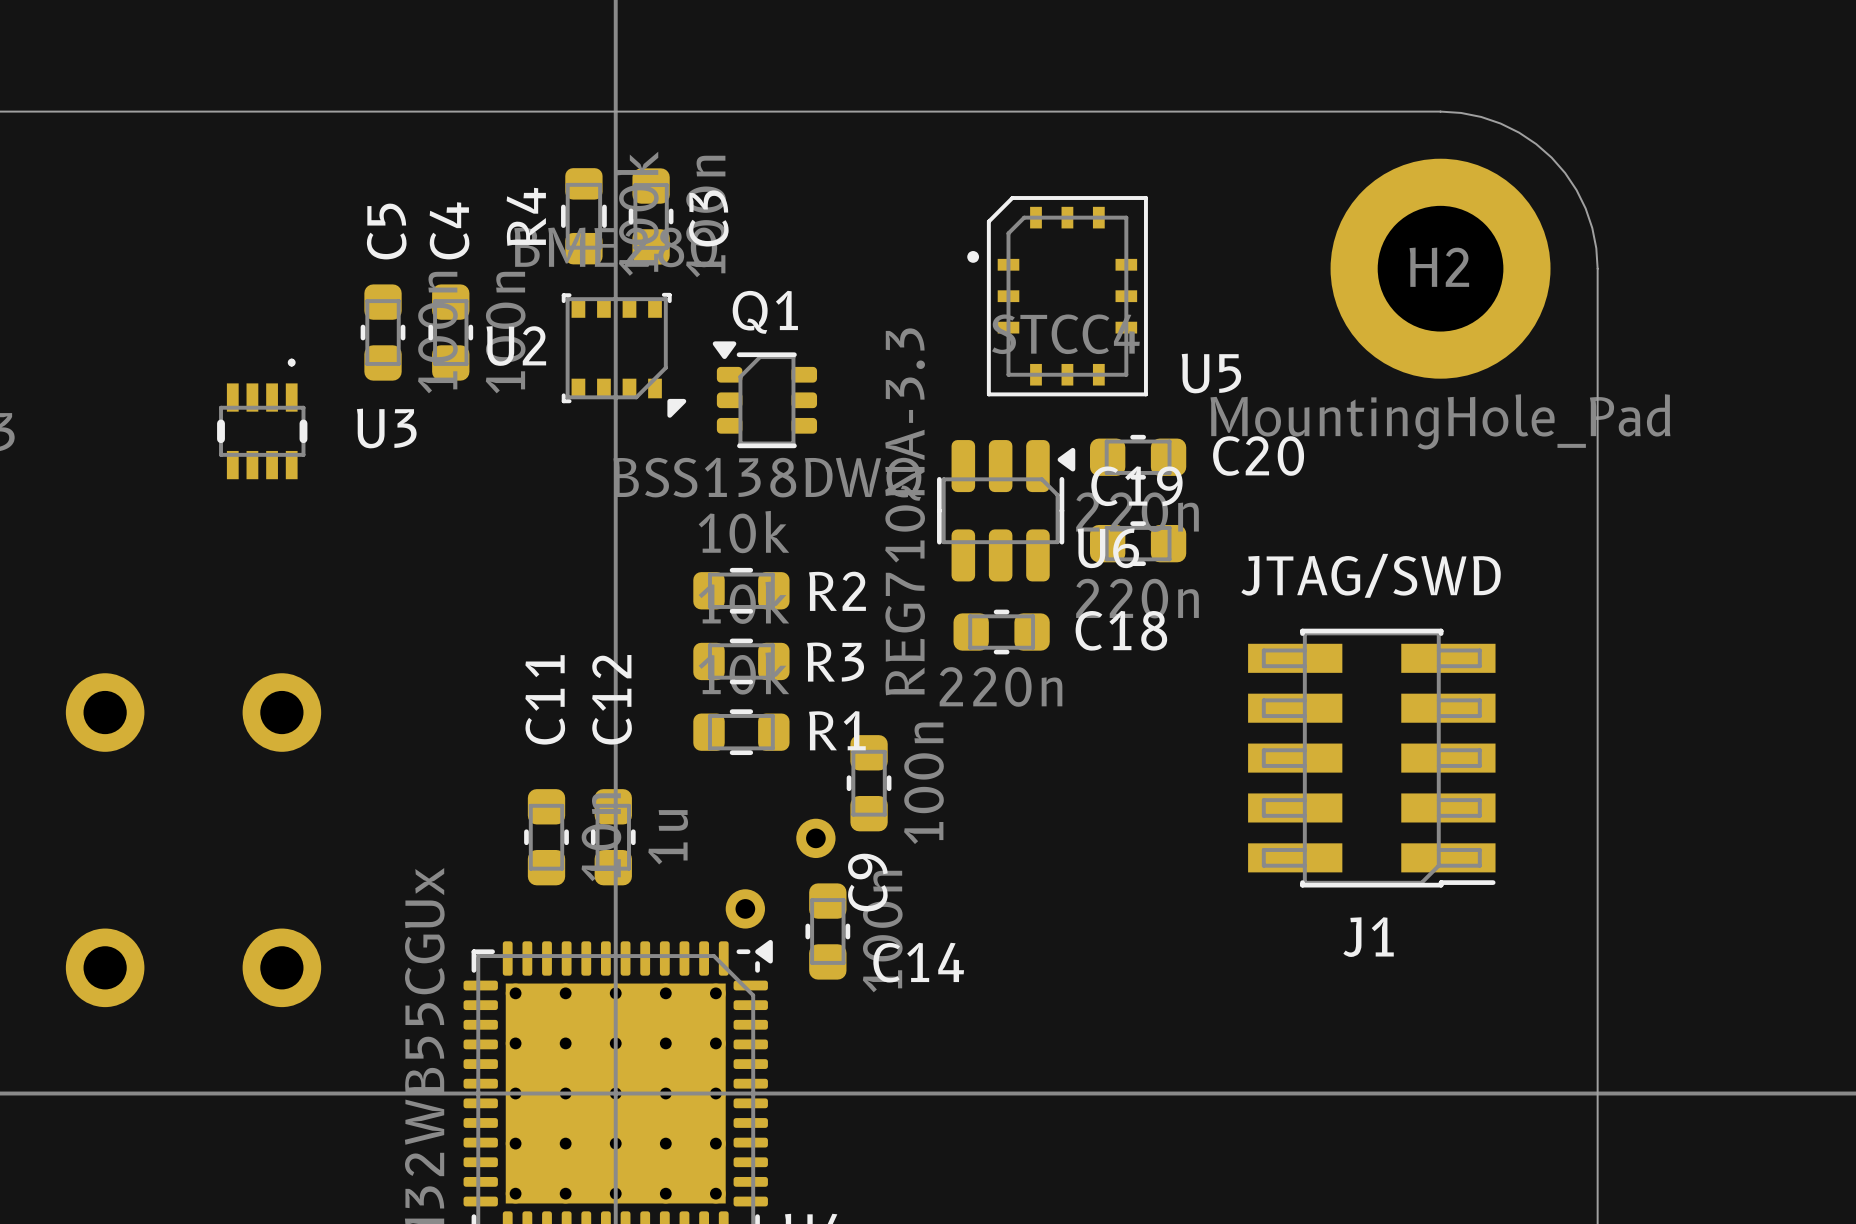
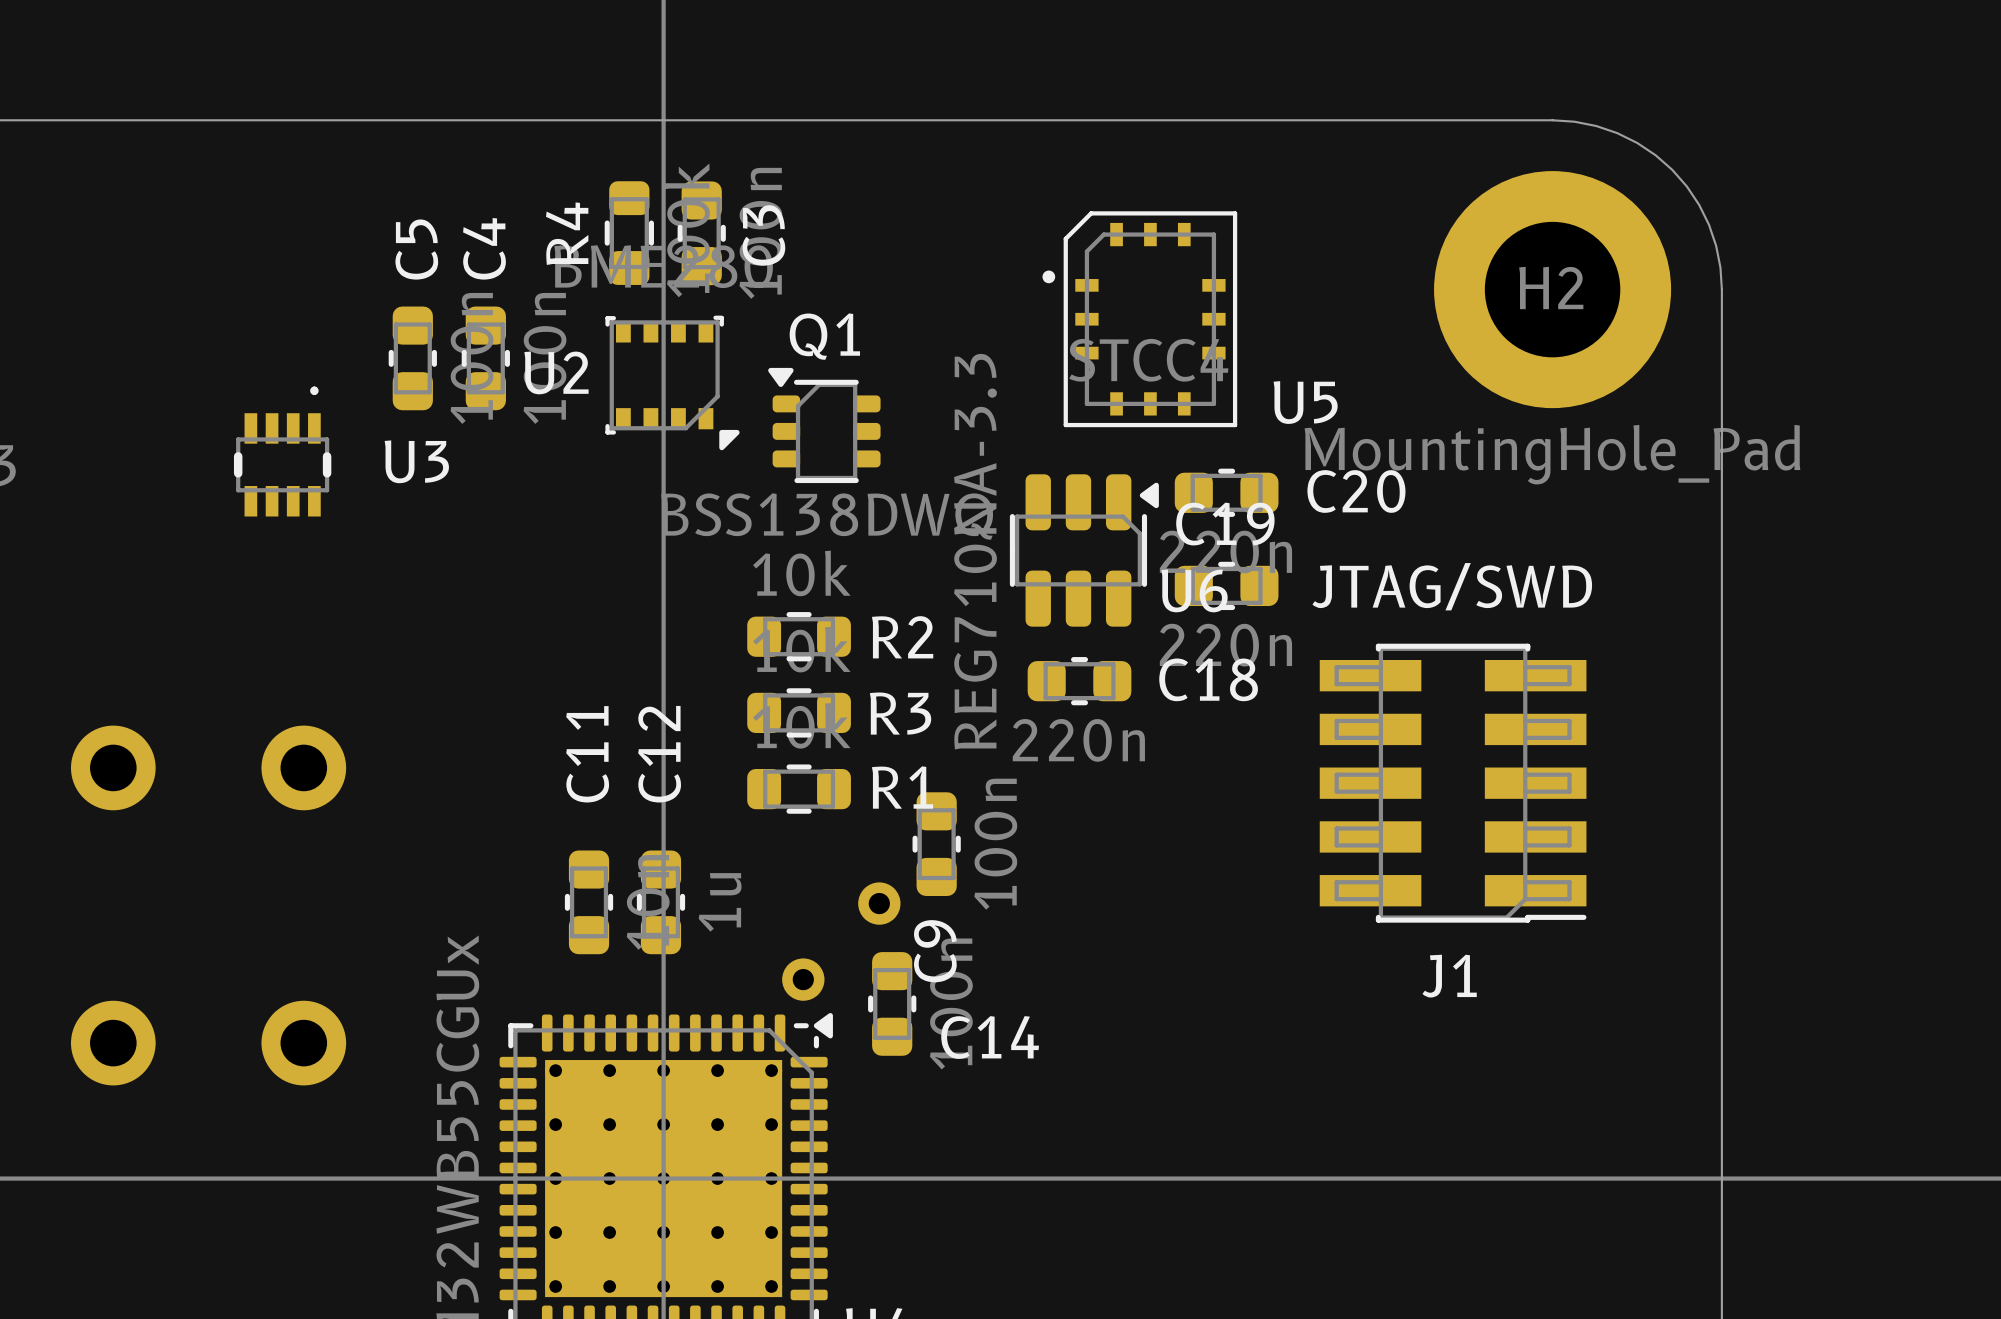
J1 position: (1371, 758) -> (1453, 783)

